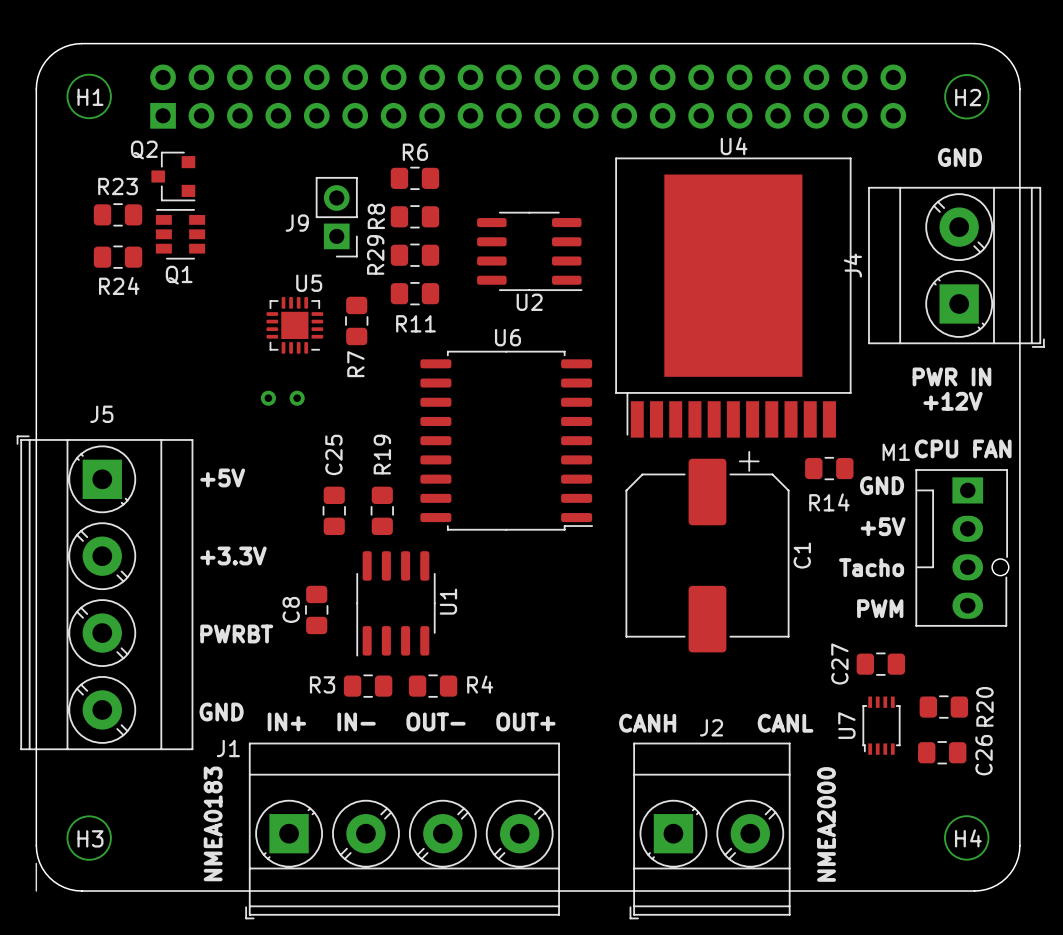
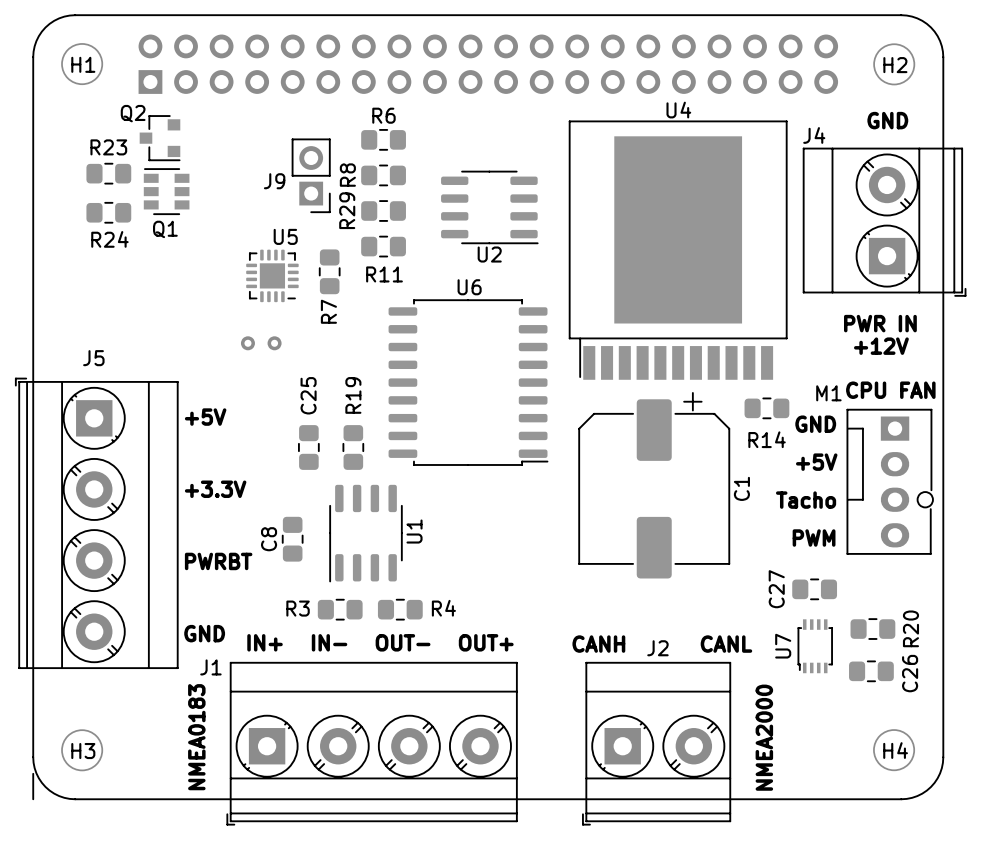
J4 name rotation: 0° (852, 265) -> 90° clockwise (814, 135)
J4 name position: J4 (852, 265) -> J4 (814, 135)

